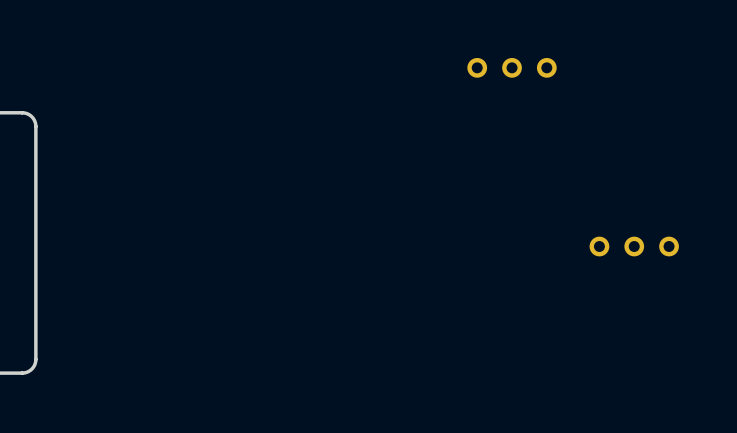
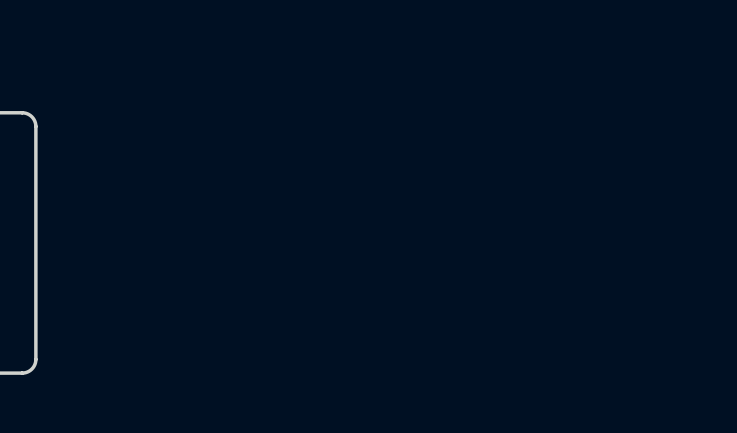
part: (512, 67) -> none
part: (634, 246) -> none

